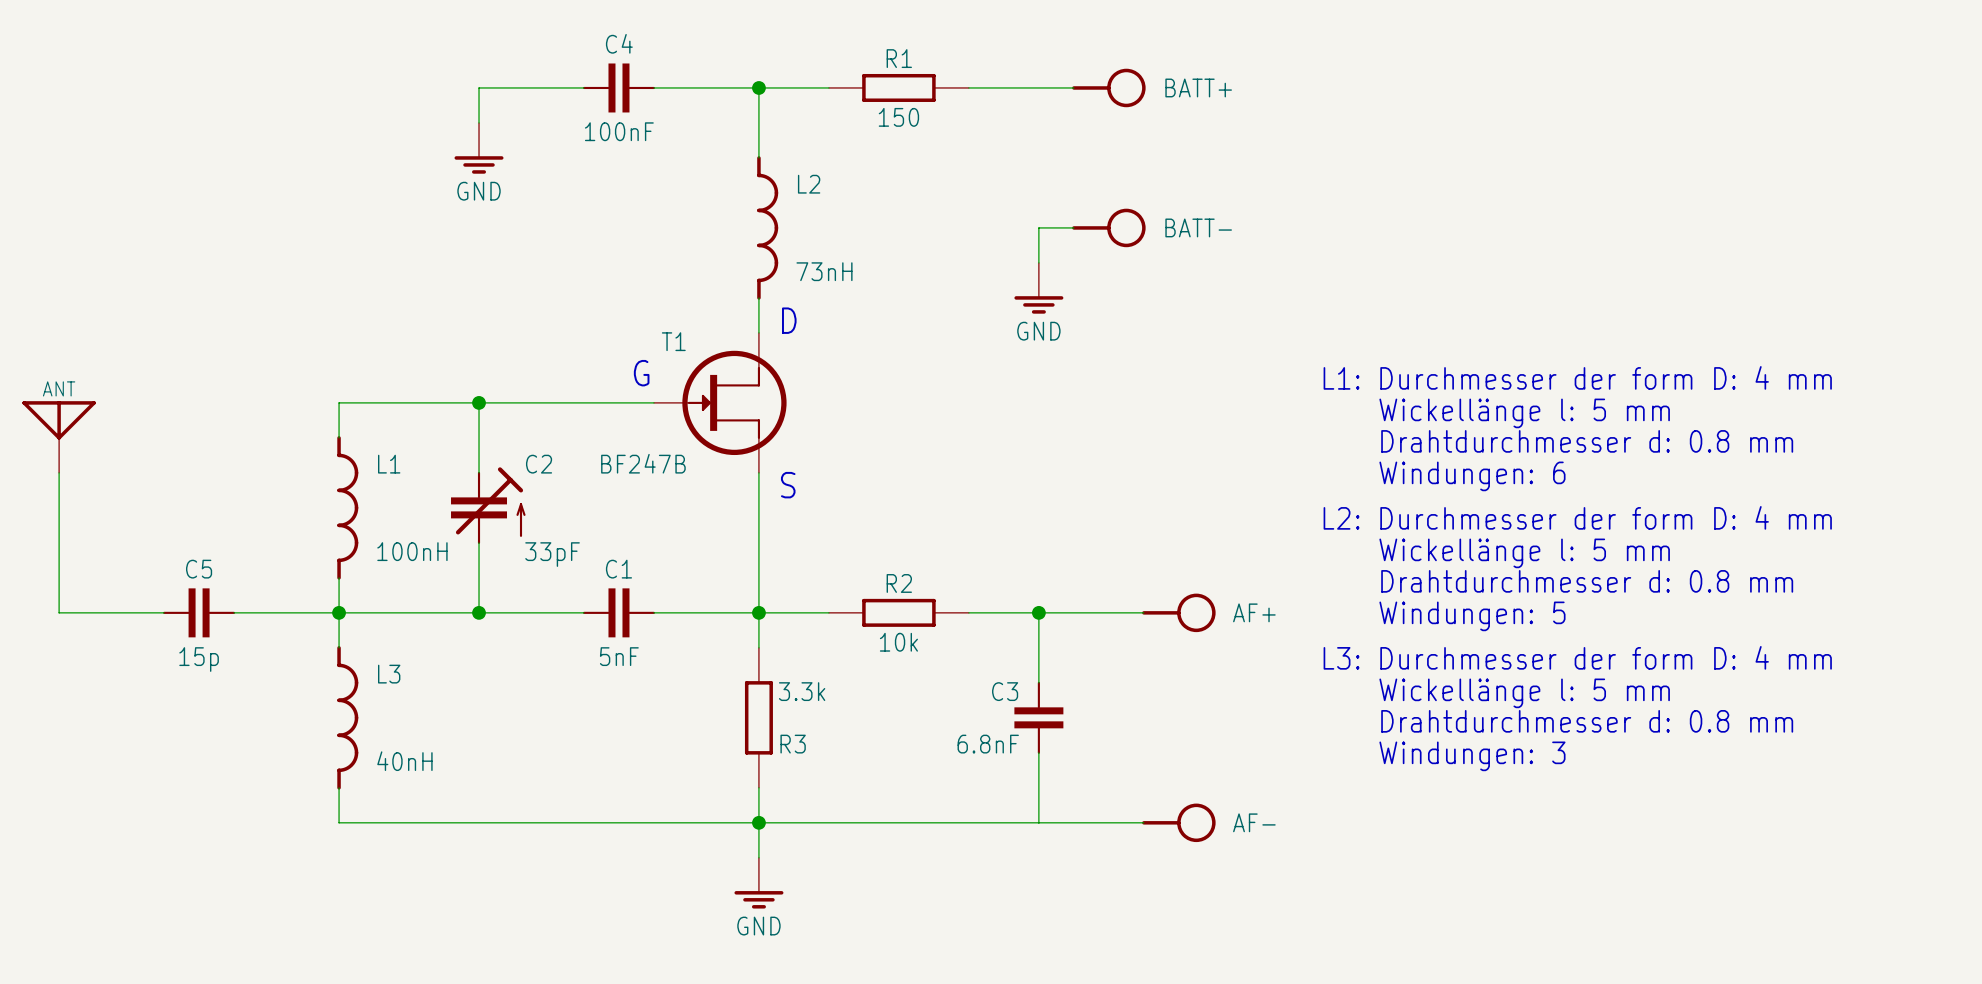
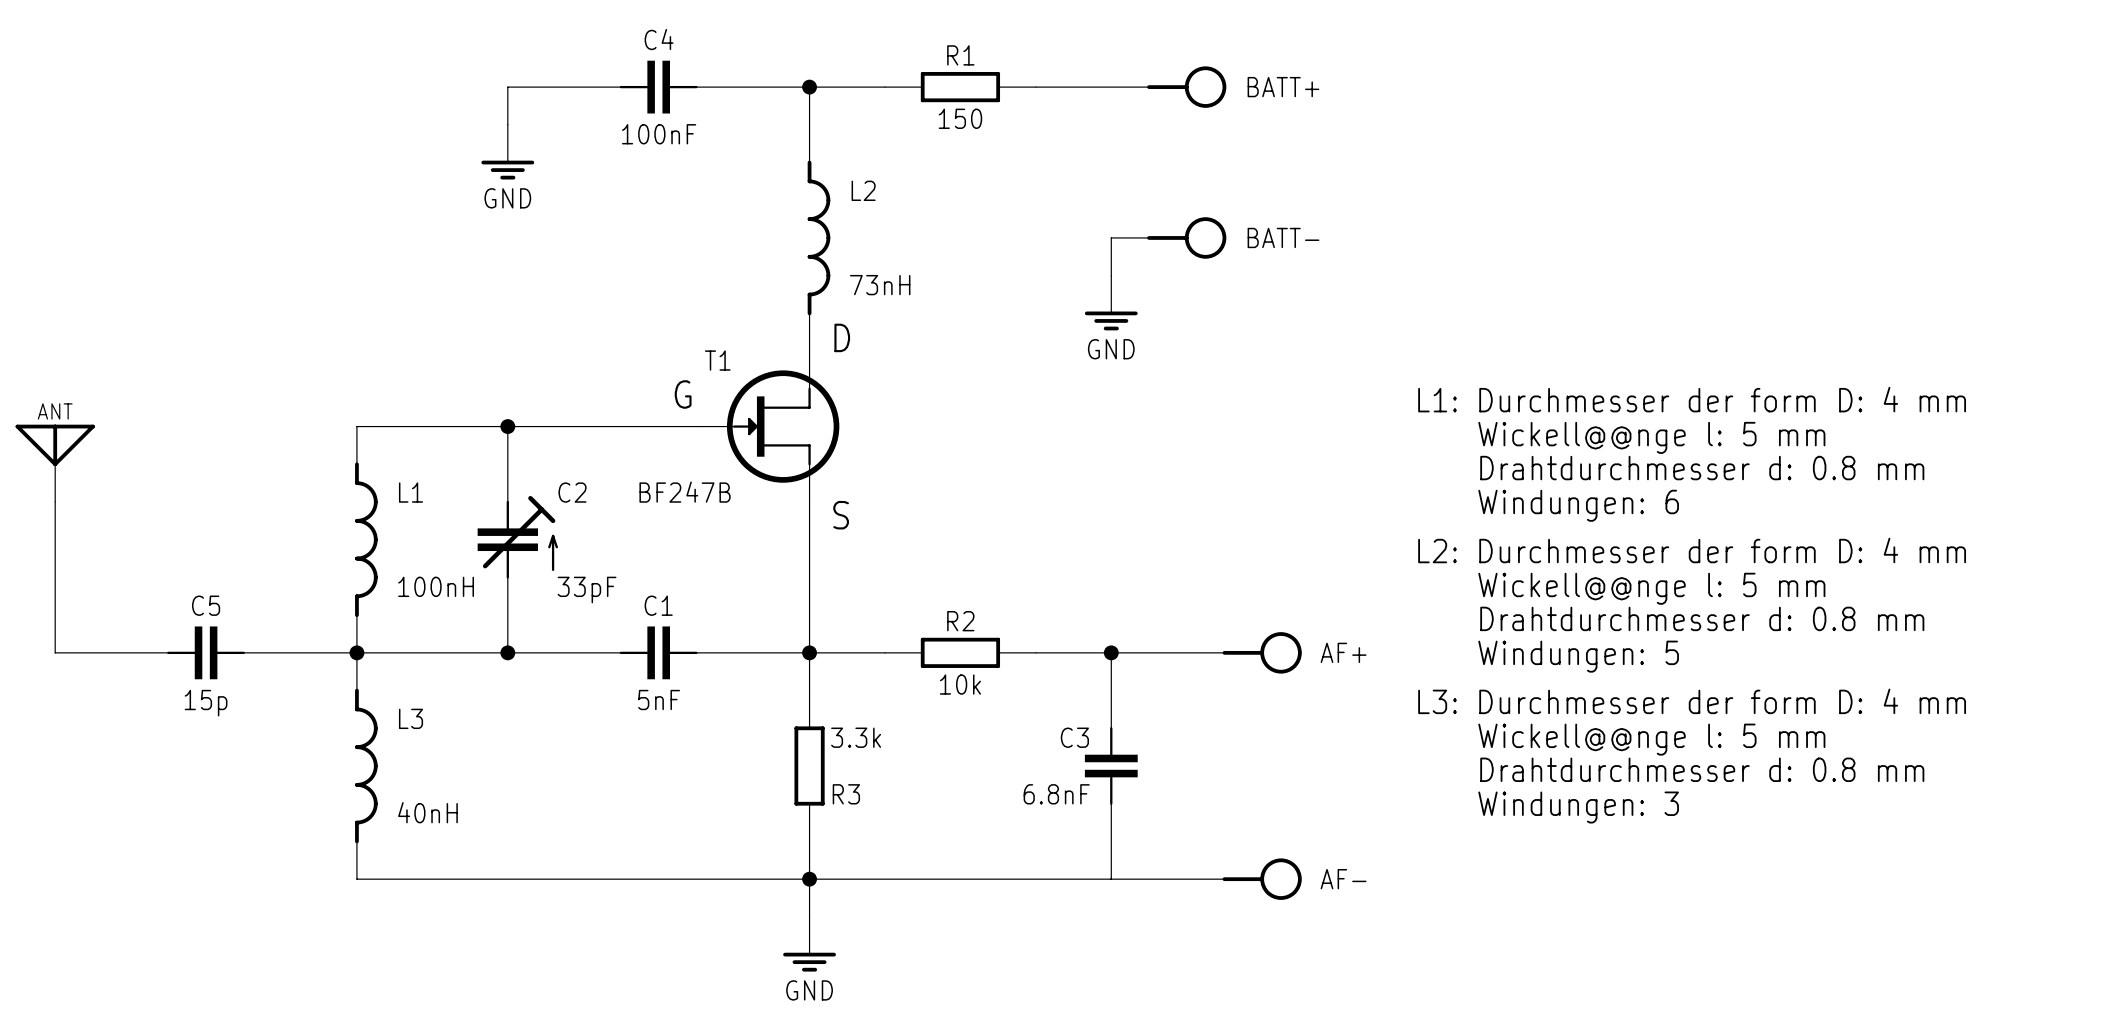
text: Wickellänge l: 5 mm (1524, 413) -> Wickell@@nge l: 5 mm (1651, 437)
text: Wickellänge l: 5 mm (1524, 553) -> Wickell@@nge l: 5 mm (1651, 588)
text: Wickellänge l: 5 mm (1524, 693) -> Wickell@@nge l: 5 mm (1651, 739)

